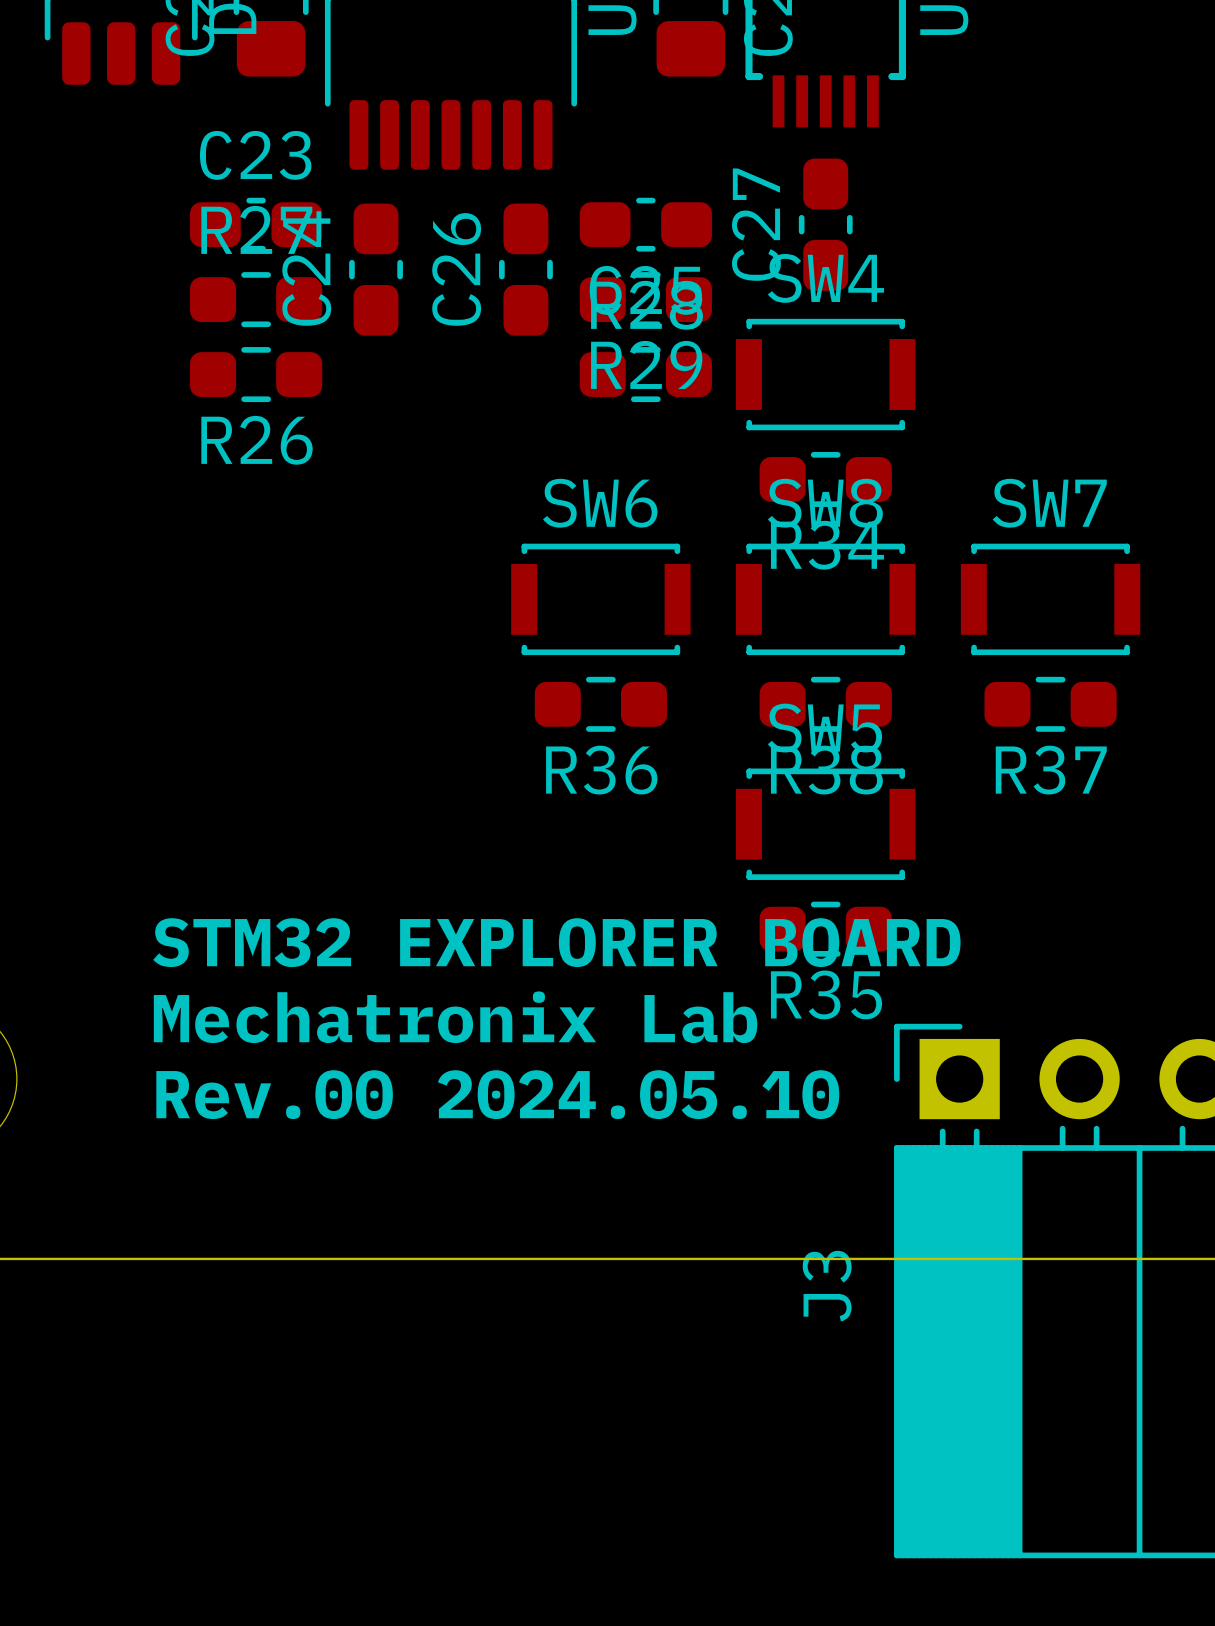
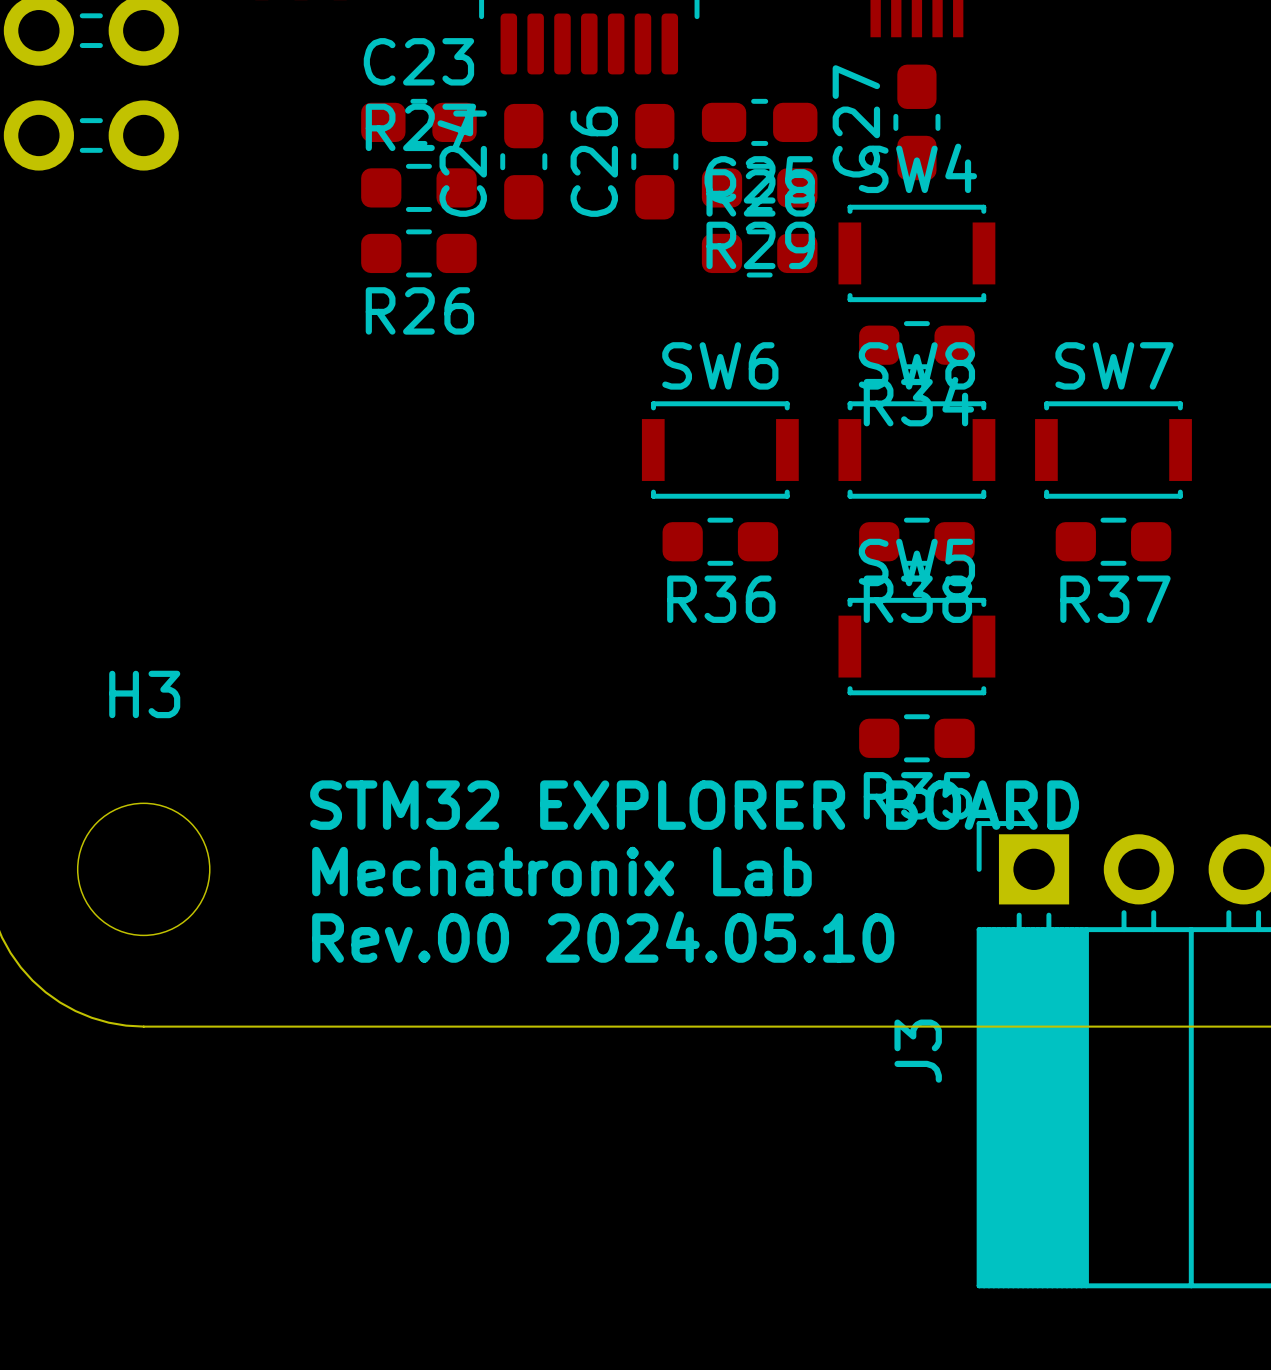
text: STM32 EXPLORER BOARD (556, 942) -> none
text: Mechatronix Lab (455, 1017) -> STM32 EXPLORER BOARD (694, 805)
text: Rev.00 2024.05.10 (497, 1094) -> Mechatronix Lab (561, 871)
text: none -> Rev.00 2024.05.10 (603, 937)

